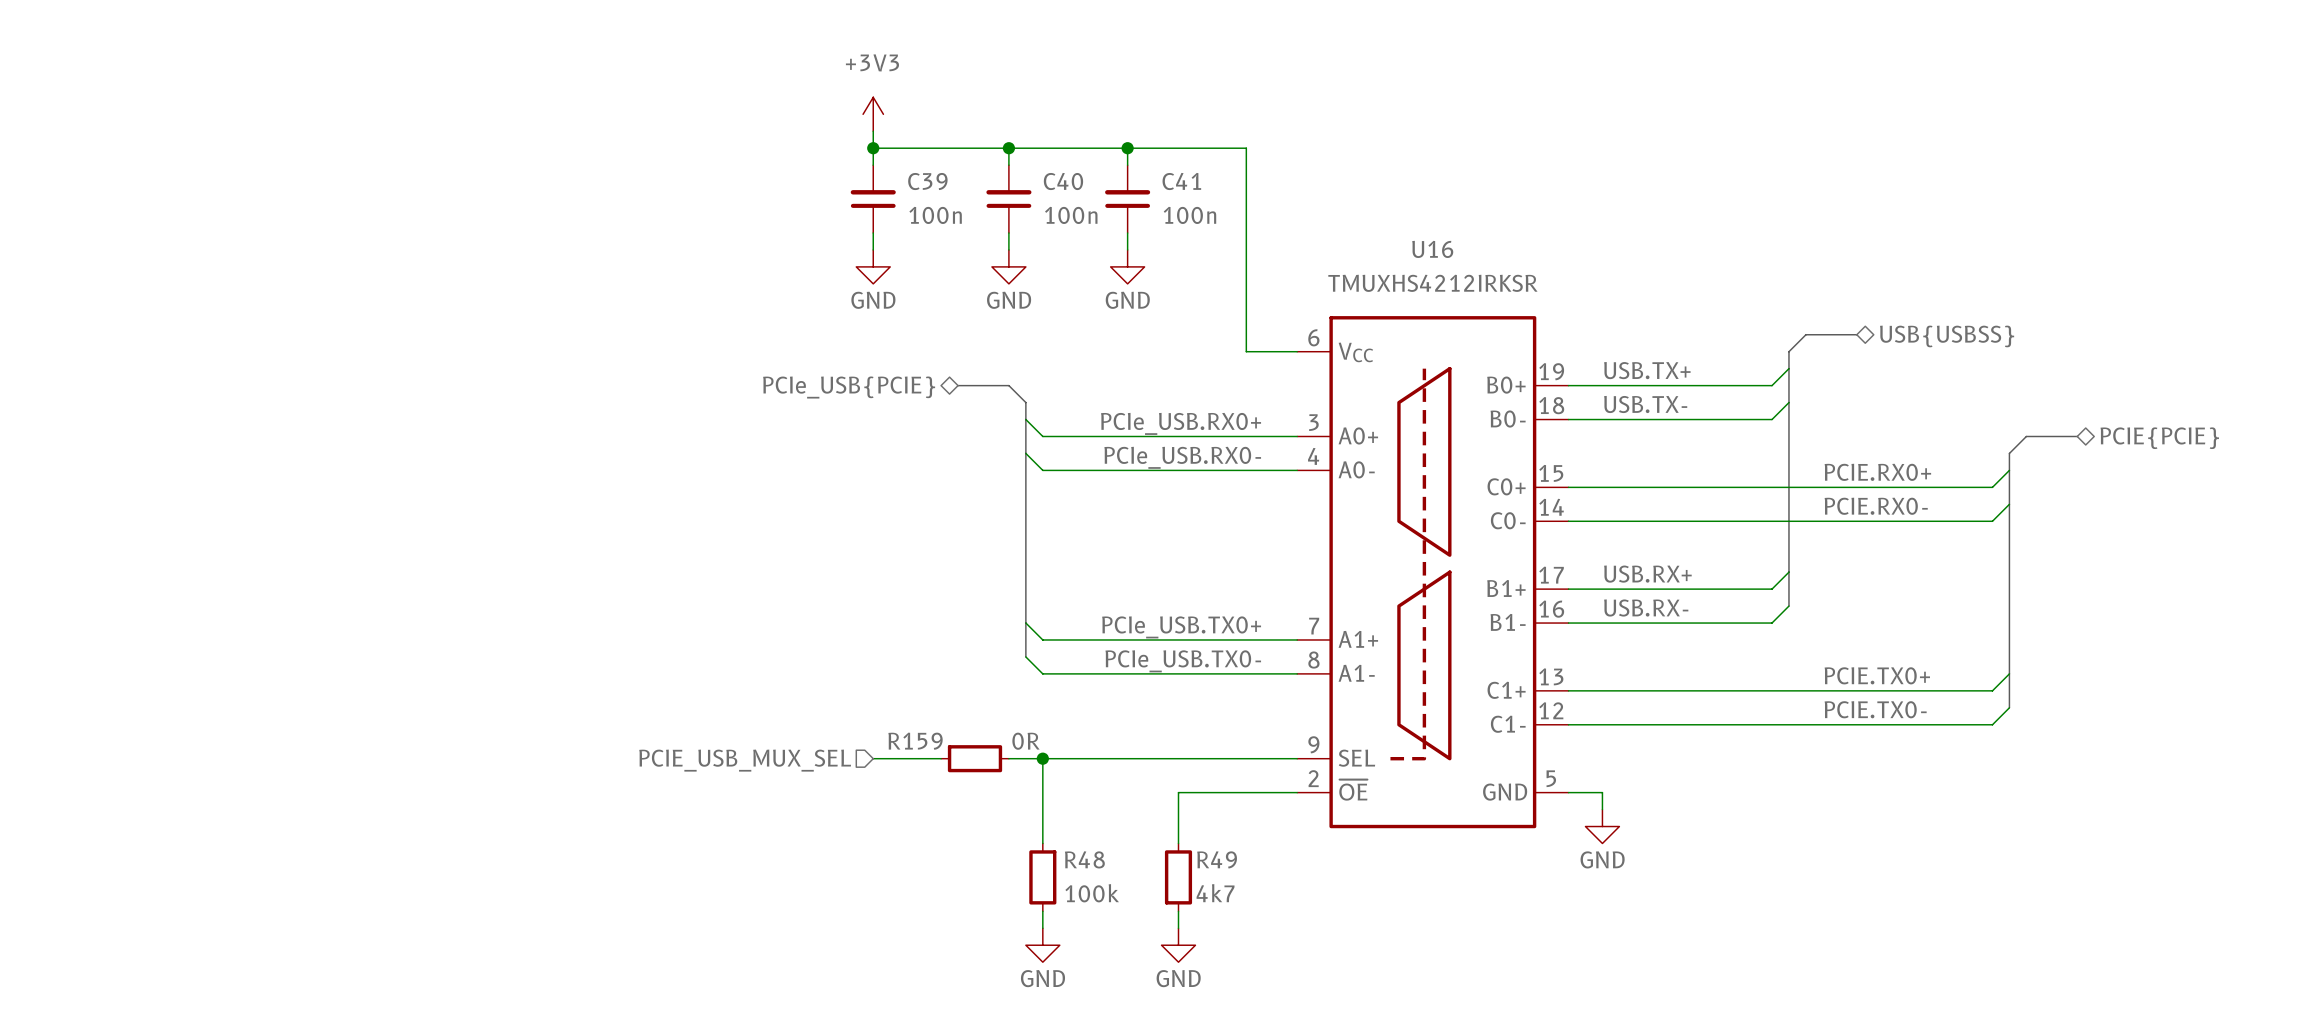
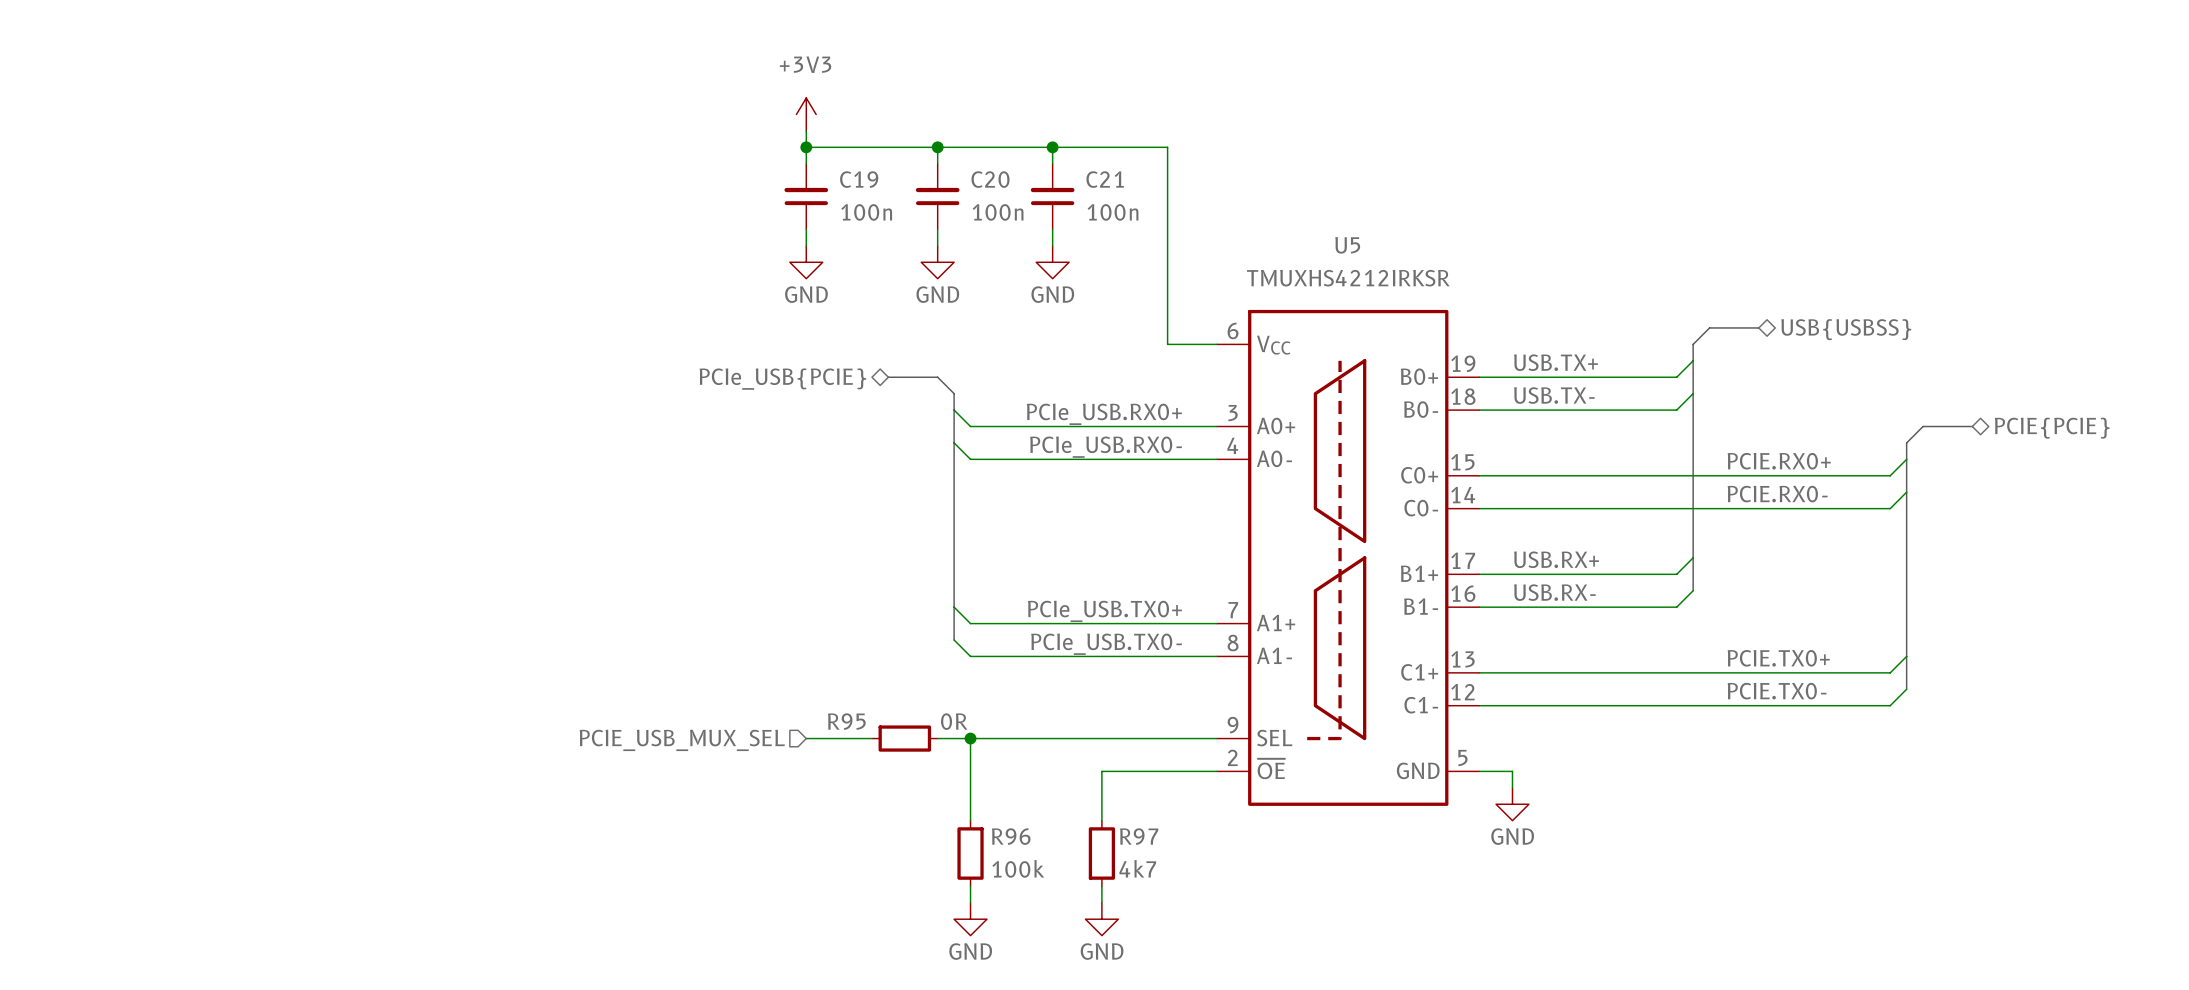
C39 name: C39 (927, 181) -> C19 (859, 179)
C40 name: C40 (1063, 181) -> C20 (990, 179)
C41 name: C41 (1181, 181) -> C21 (1105, 179)
U16 name: U16 (1432, 249) -> U5 (1347, 245)
R159 name: R159 (915, 741) -> R95 (846, 721)
R48 name: R48 (1084, 859) -> R96 (1011, 836)
R49 name: R49 (1217, 859) -> R97 (1139, 836)

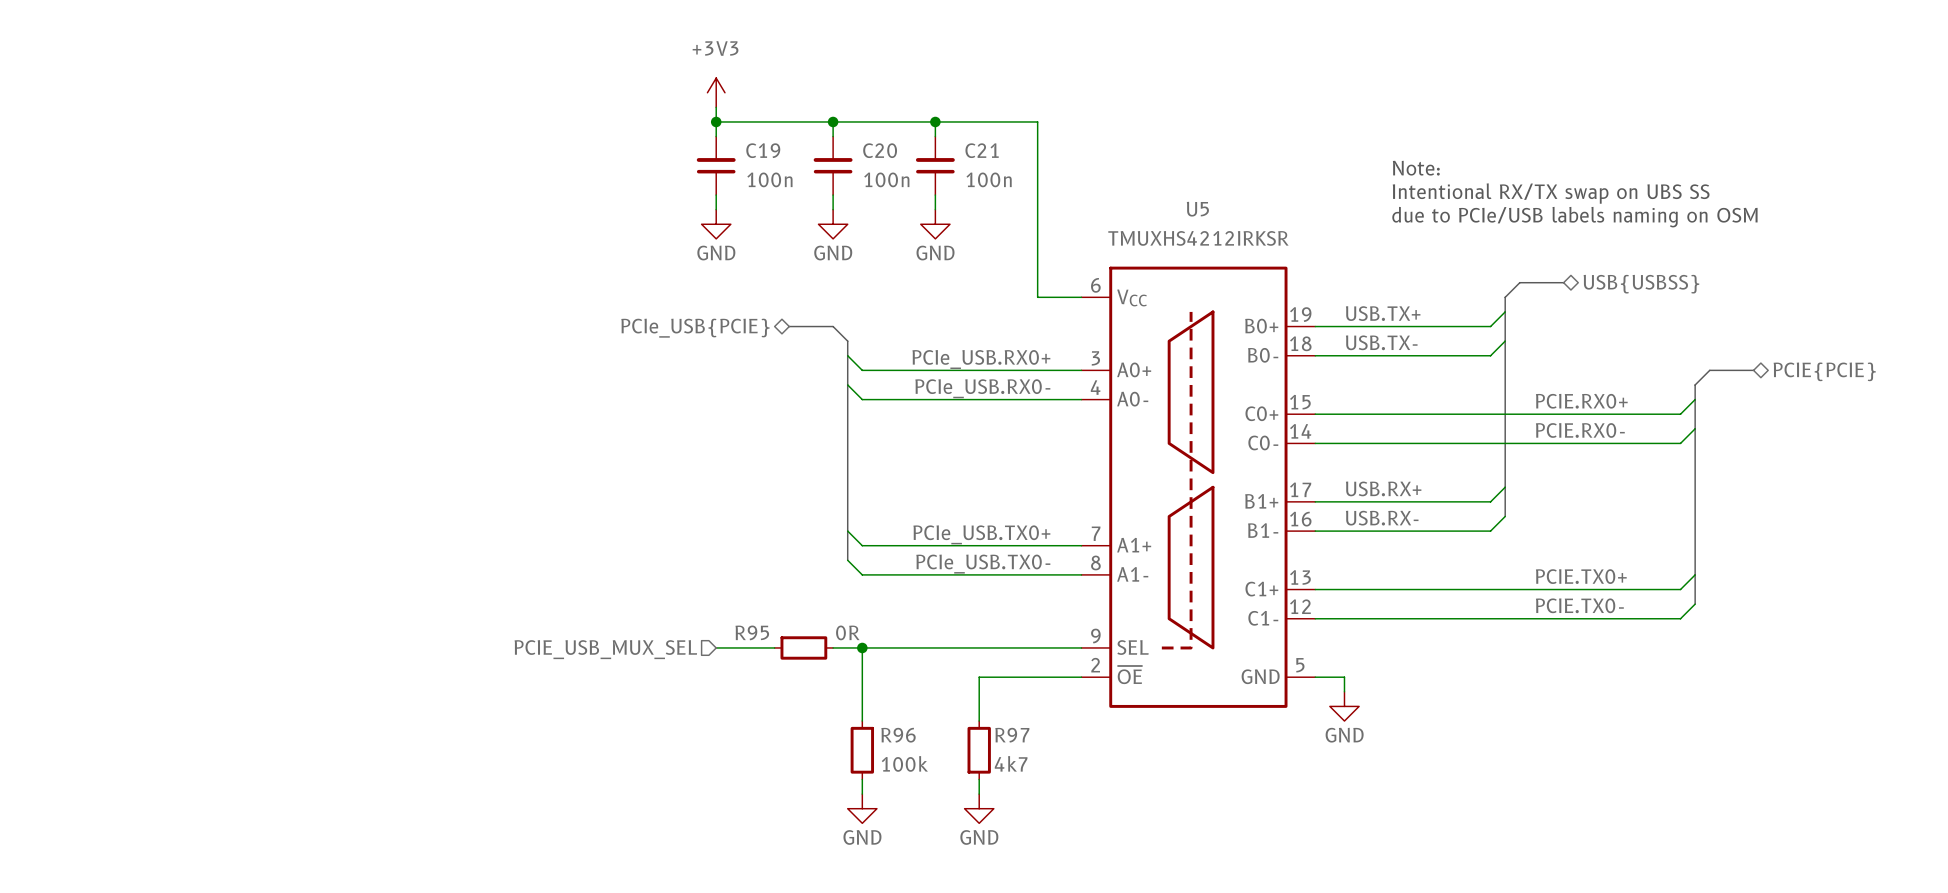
text: none -> Note: (1416, 168)
text: none -> Intentional RX/TX swap on UBS SS (1551, 193)
text: none -> due to PCIe/USB labels naming on OSM (1574, 217)

